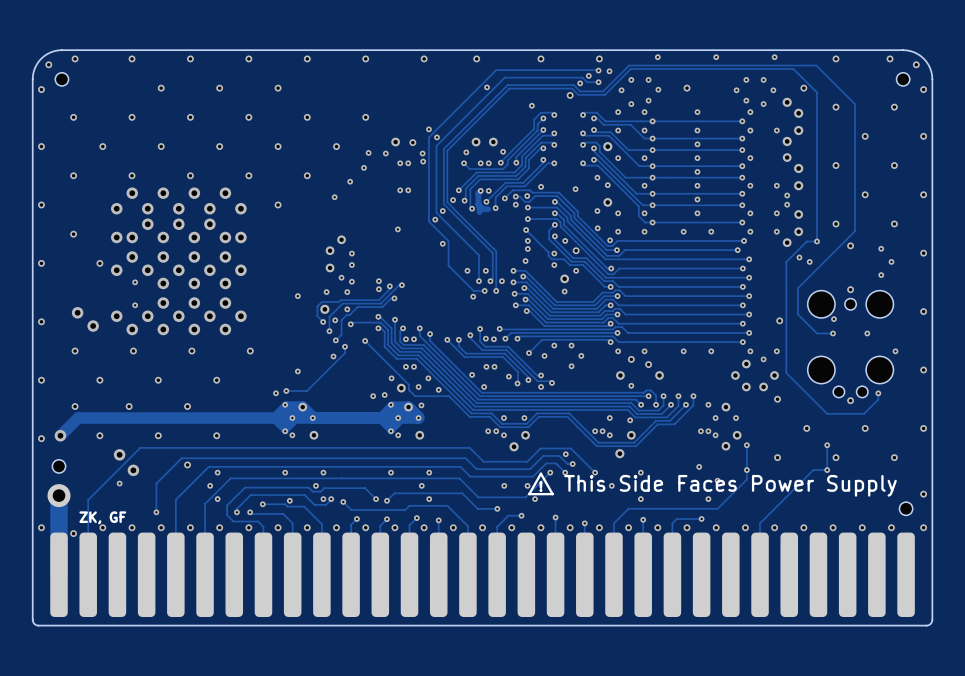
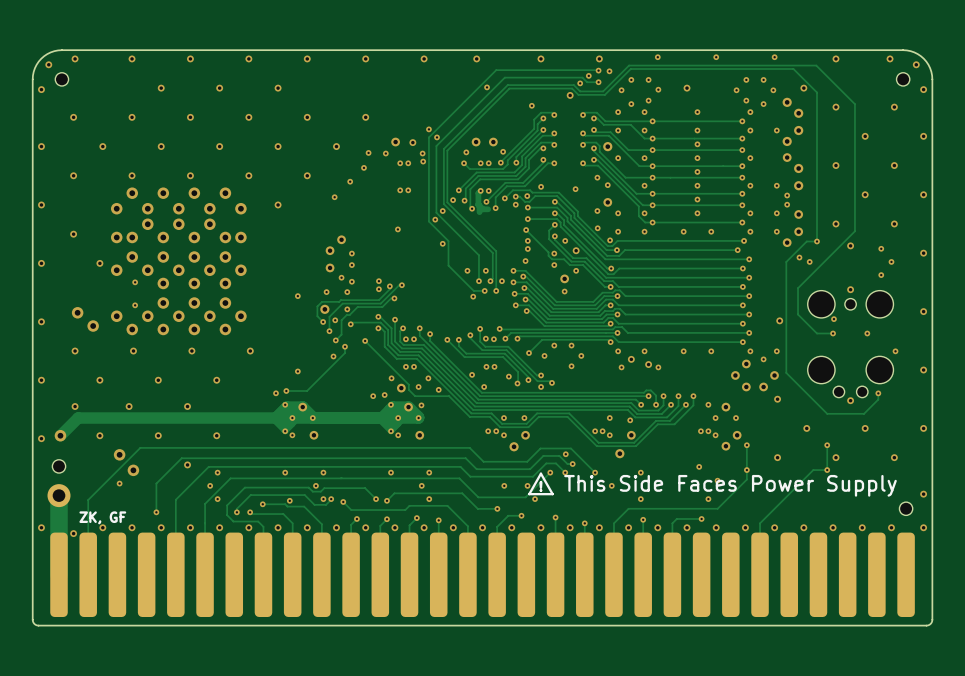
via: none -> (621, 367)
via: none -> (658, 367)
via: (620, 375) -> none
via: (659, 375) -> none
via: (631, 385) -> none

